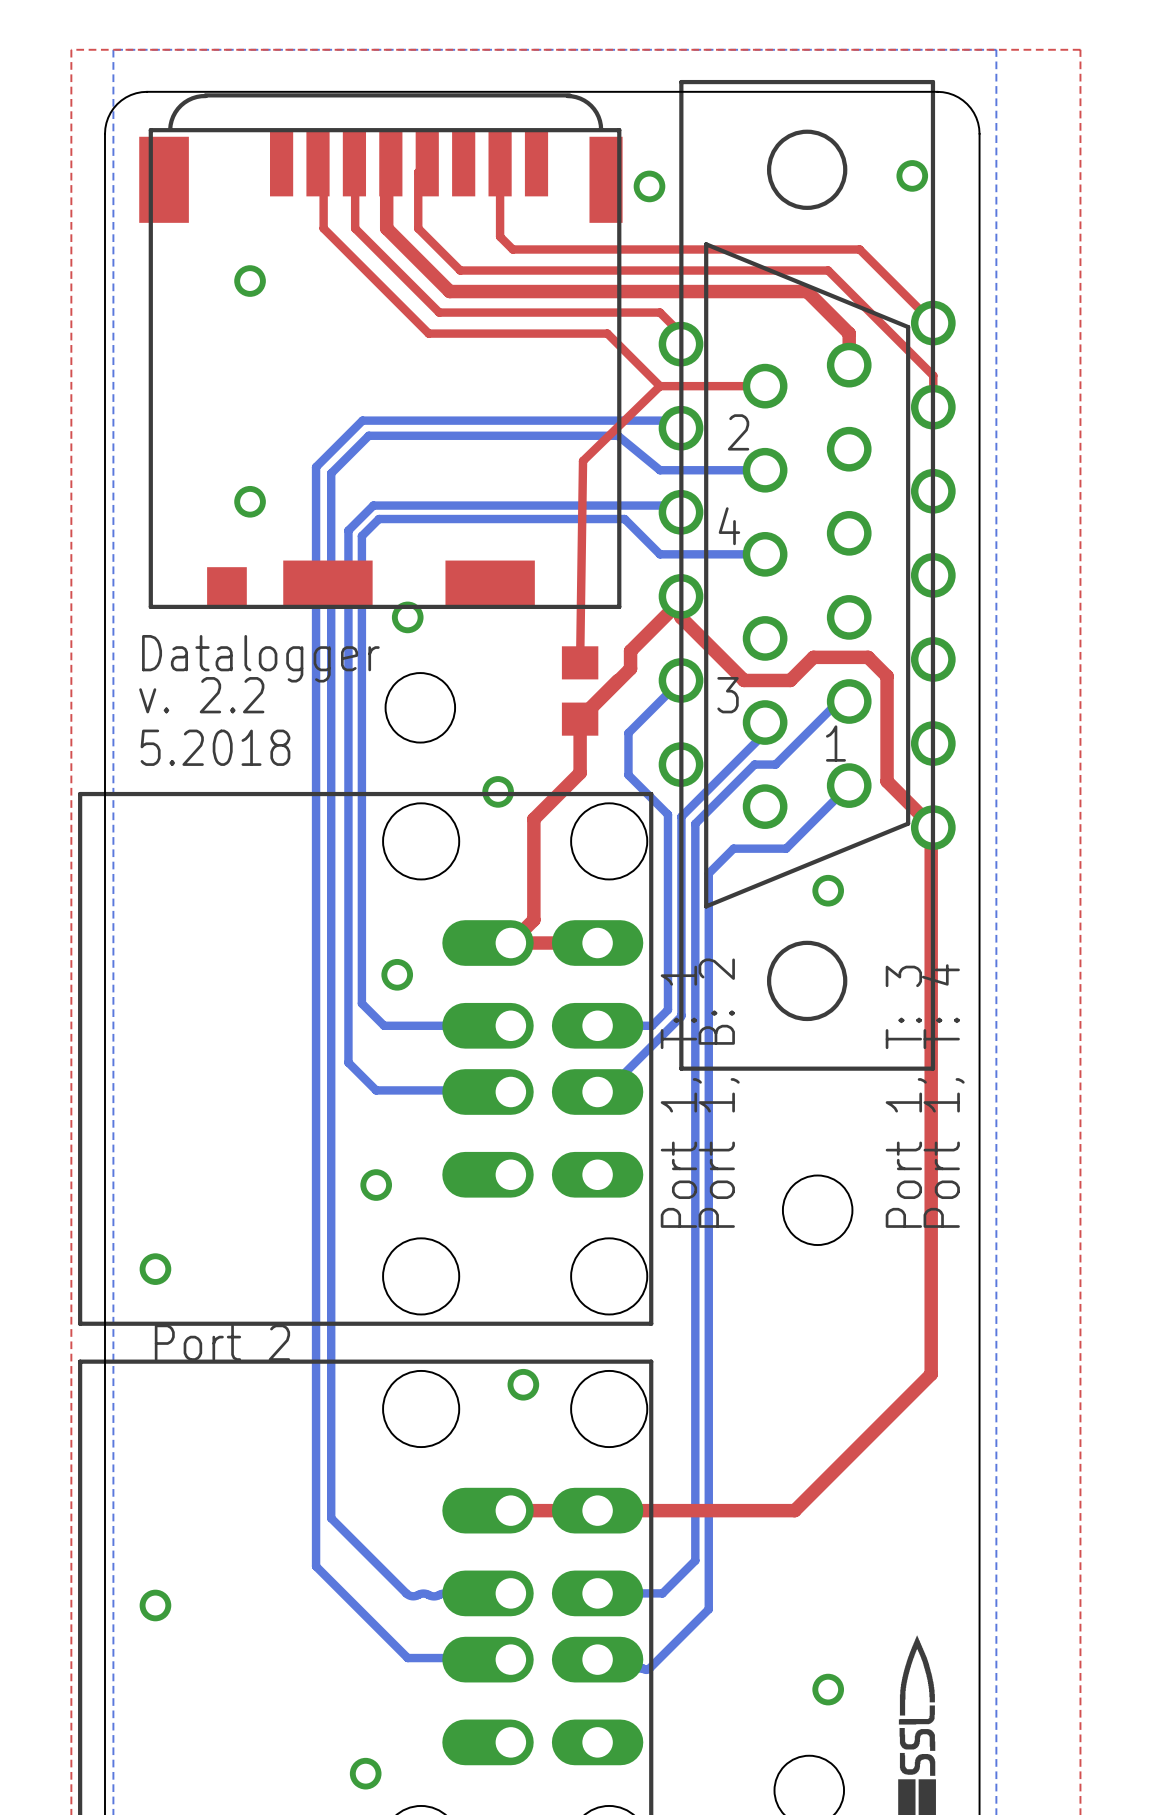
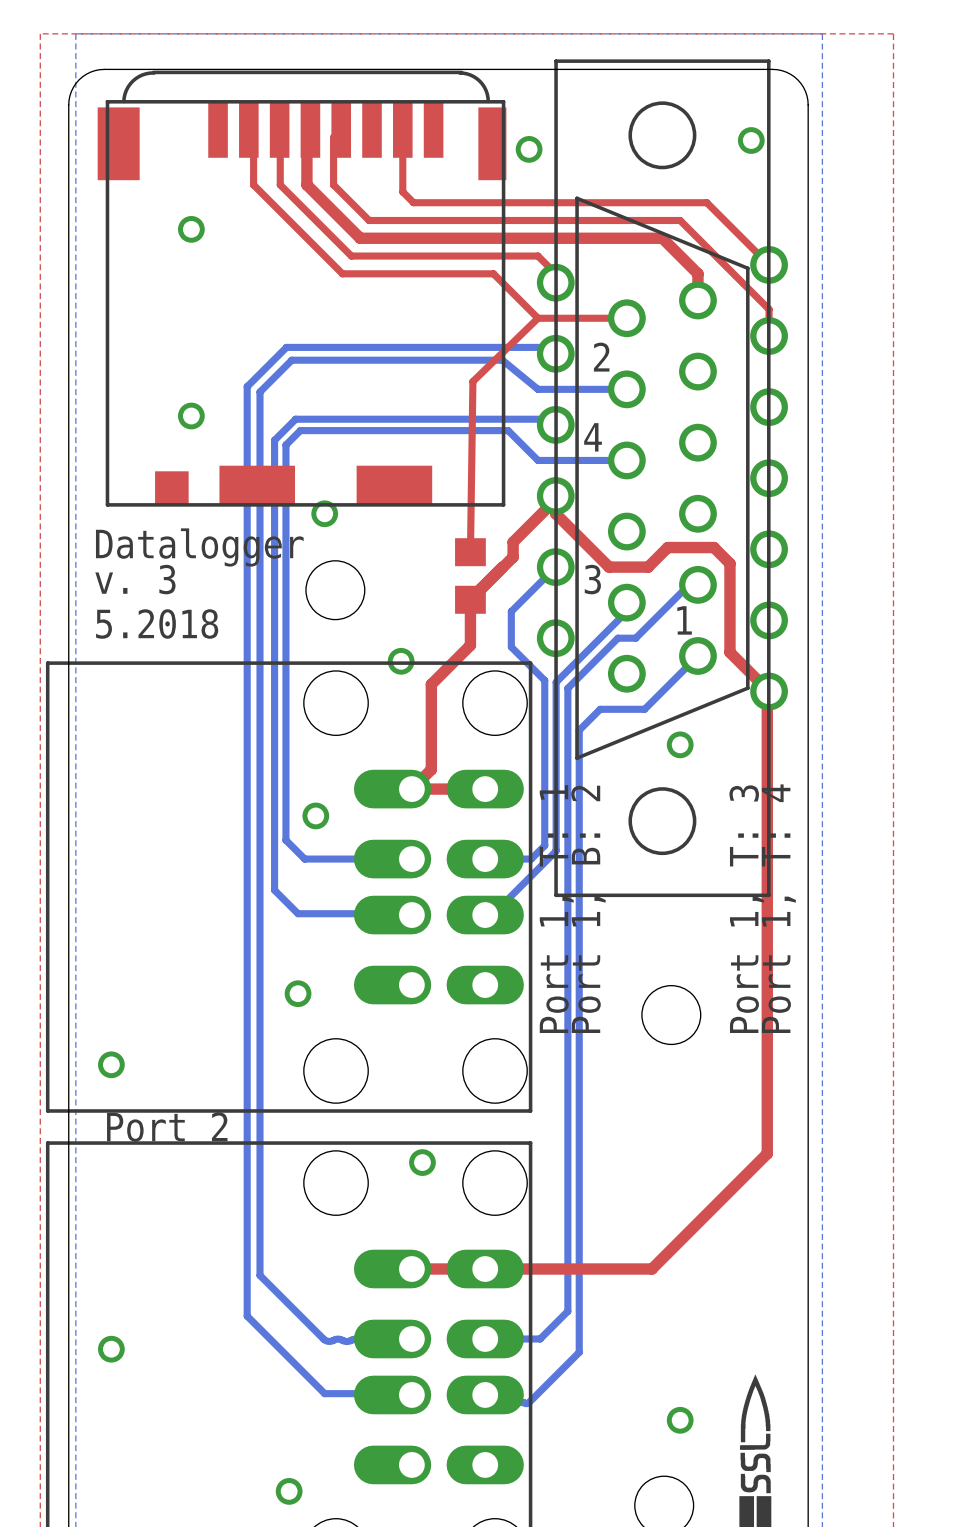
text: v. 2.2 (201, 695) -> v. 3 (135, 579)

